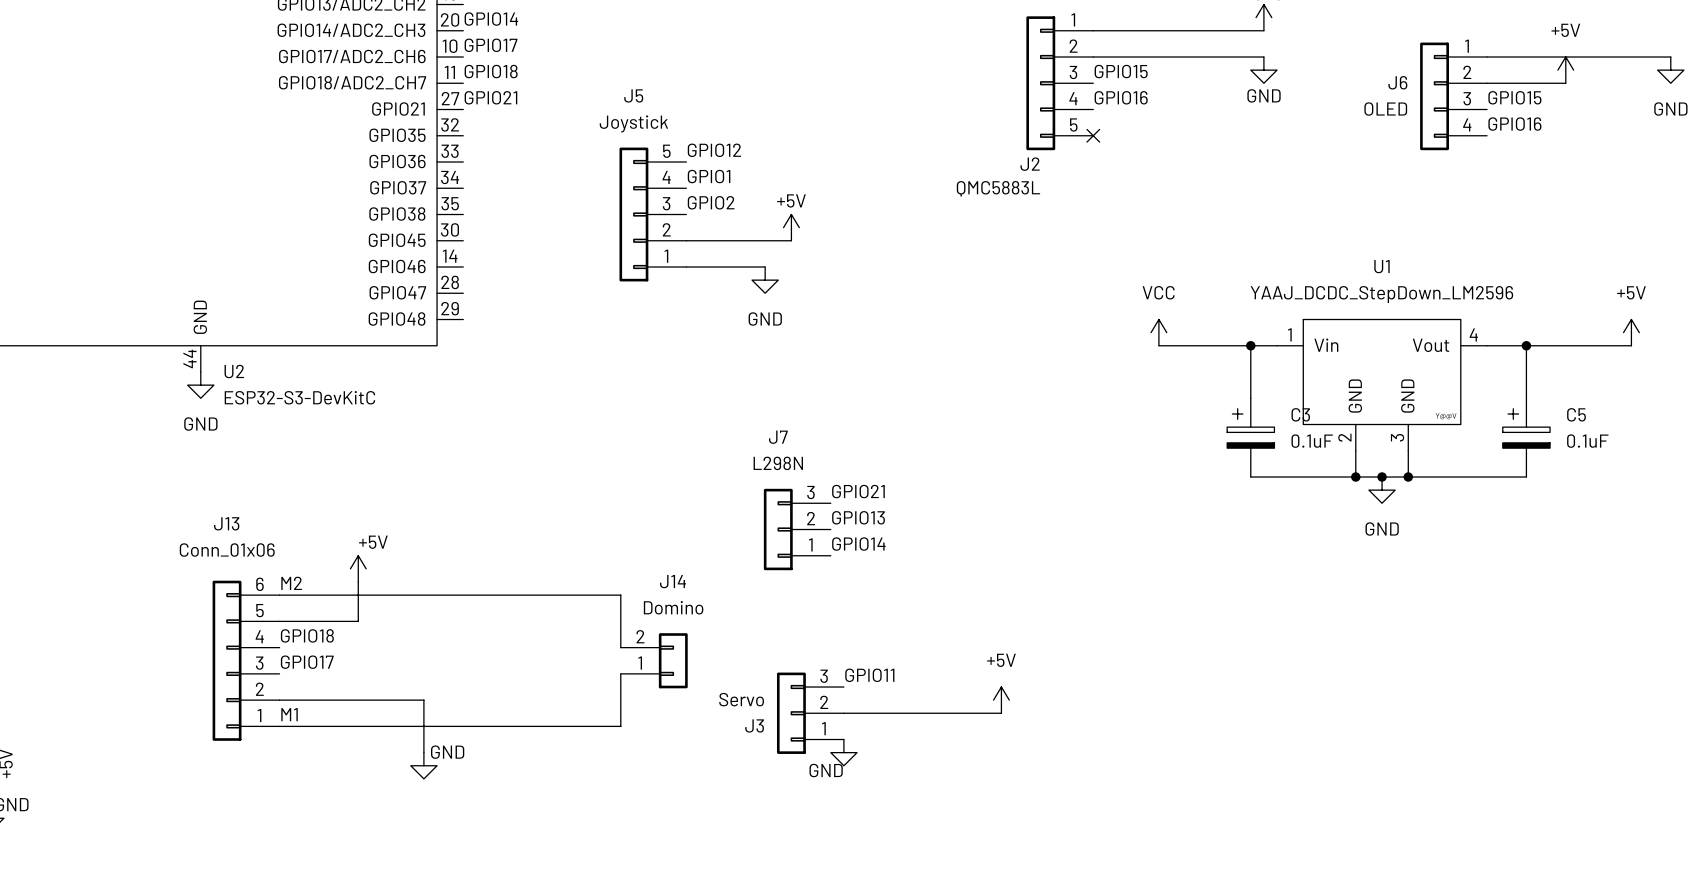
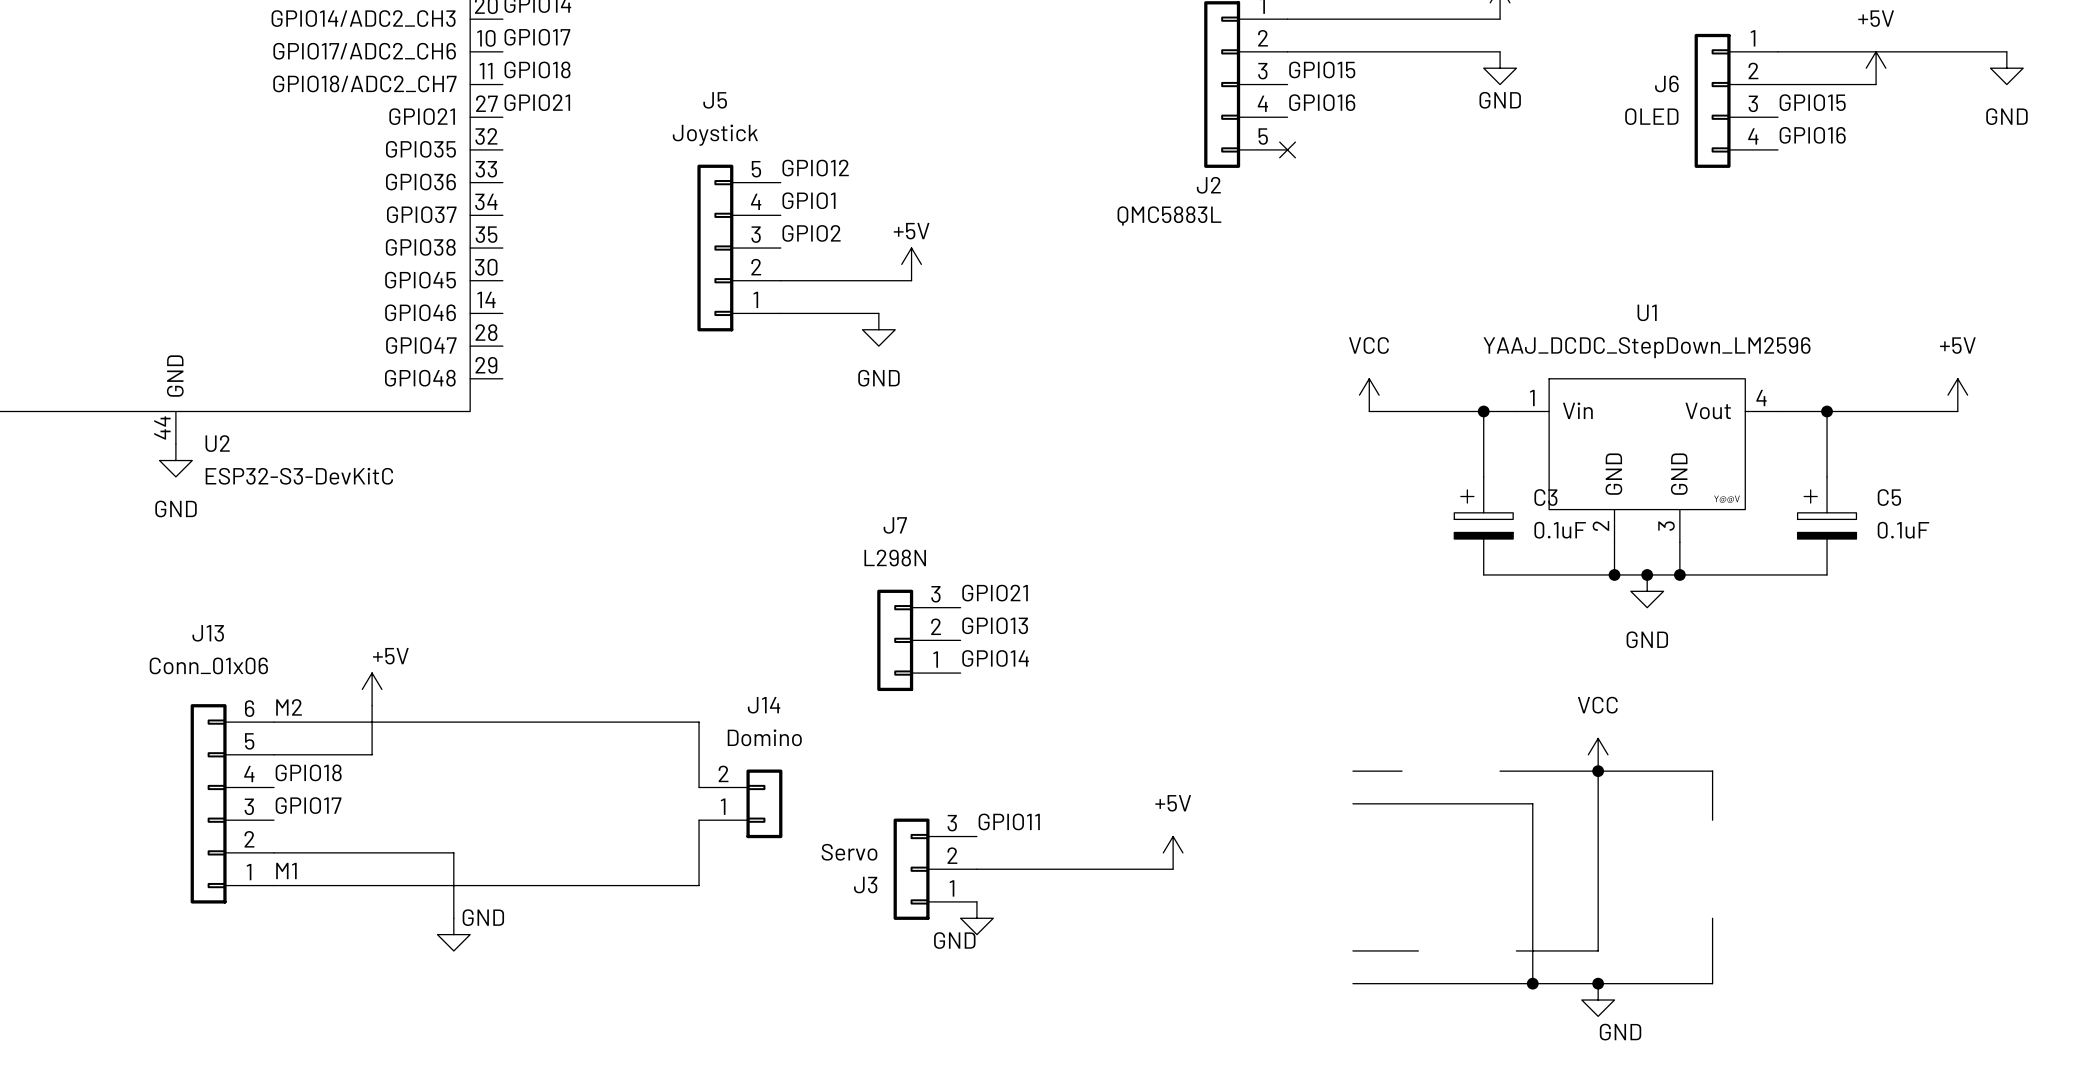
power symbol: none -> VCC (1598, 754)
wire: none -> (1352, 771) (1401, 771)
wire: none -> (1500, 771) (1712, 771) (1712, 820)
wire: none -> (1598, 771) (1598, 950) (1516, 950)
junction: none -> (1598, 771)
wire: none -> (1352, 803) (1532, 803) (1532, 983)
wire: none -> (1712, 918) (1712, 983) (1352, 983)
wire: none -> (1352, 950) (1418, 950)
junction: none -> (1532, 983)
junction: none -> (1598, 983)
power symbol: none -> GND (1598, 1000)

